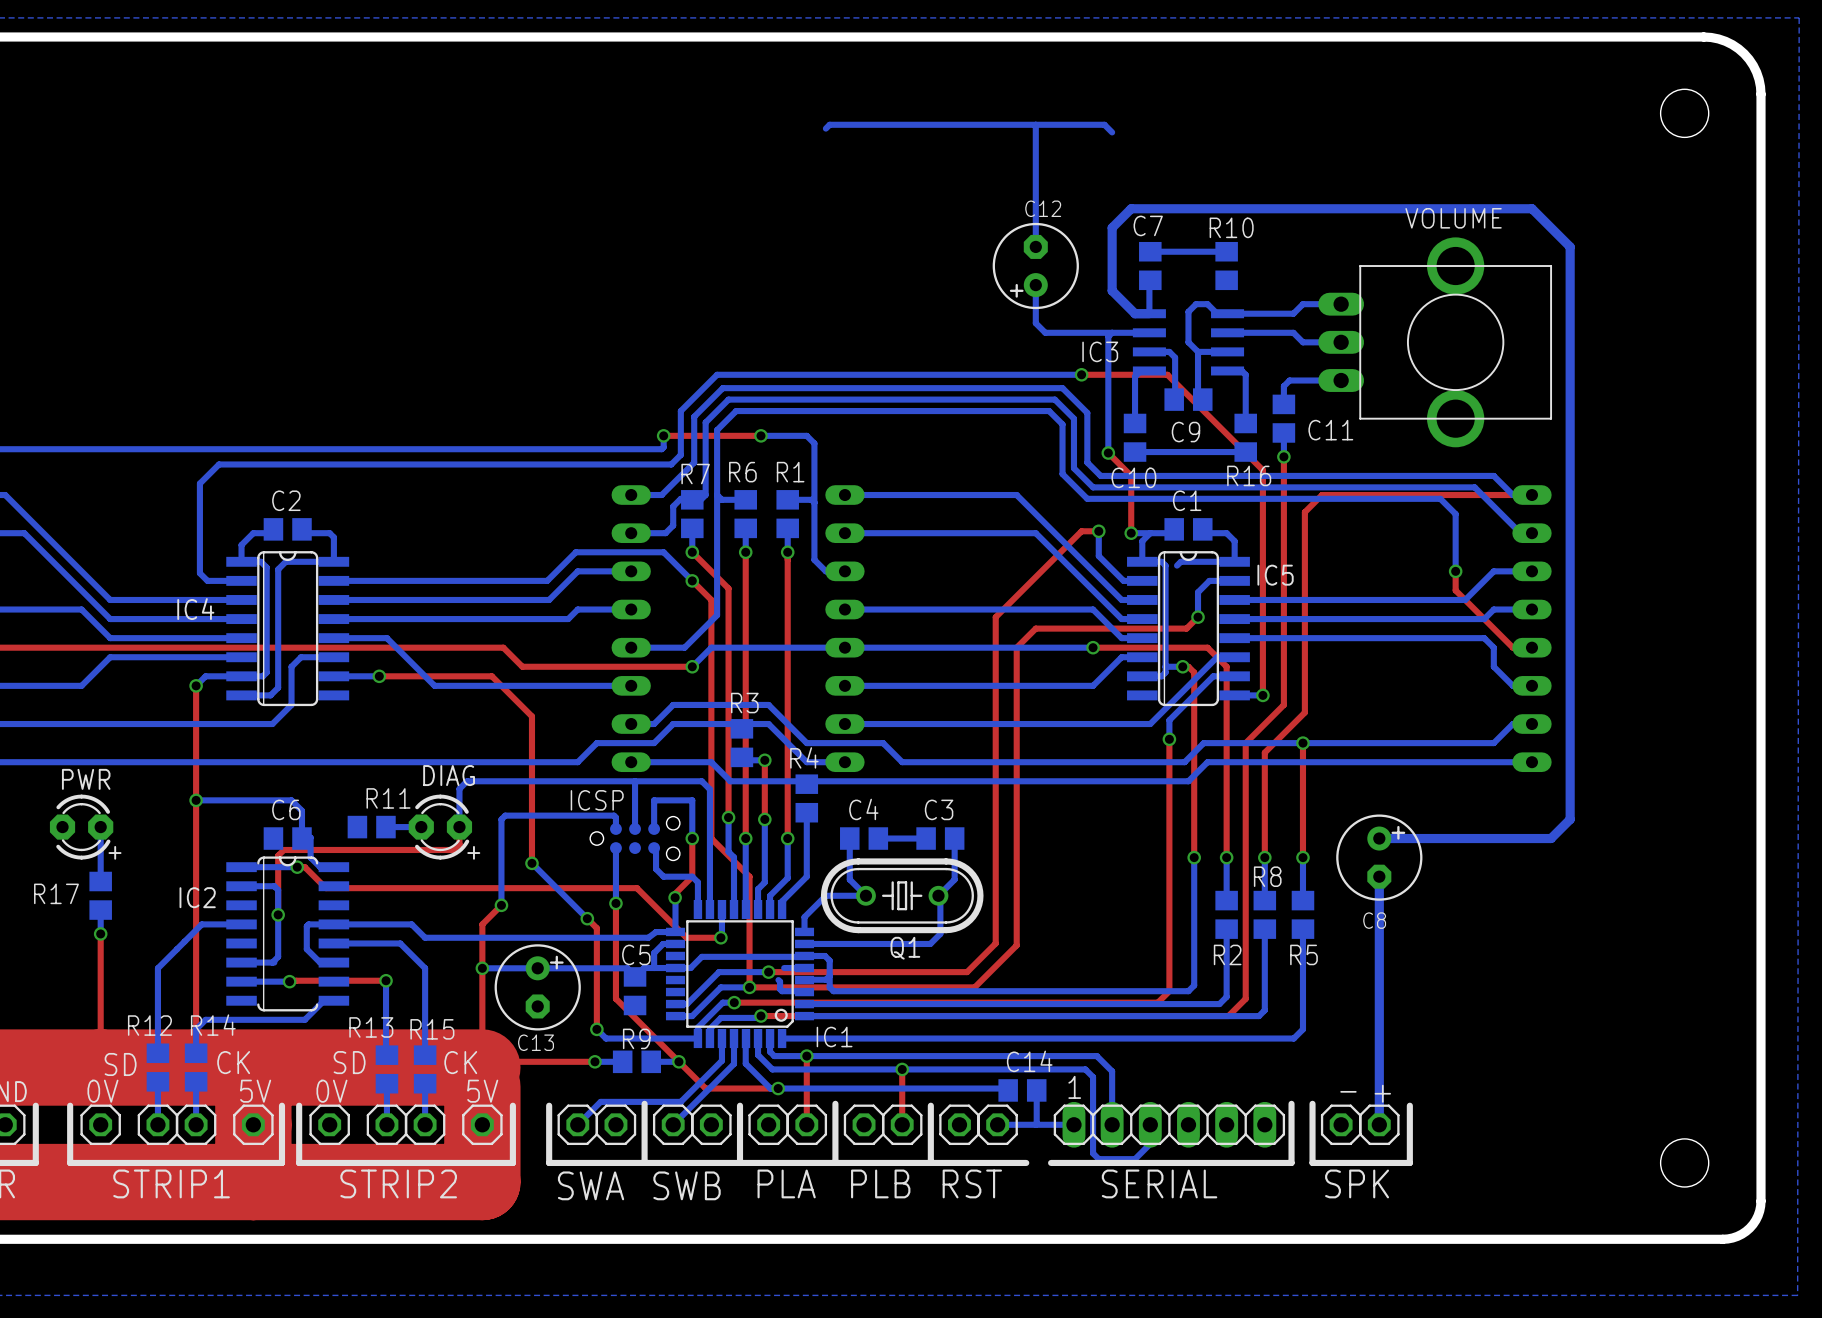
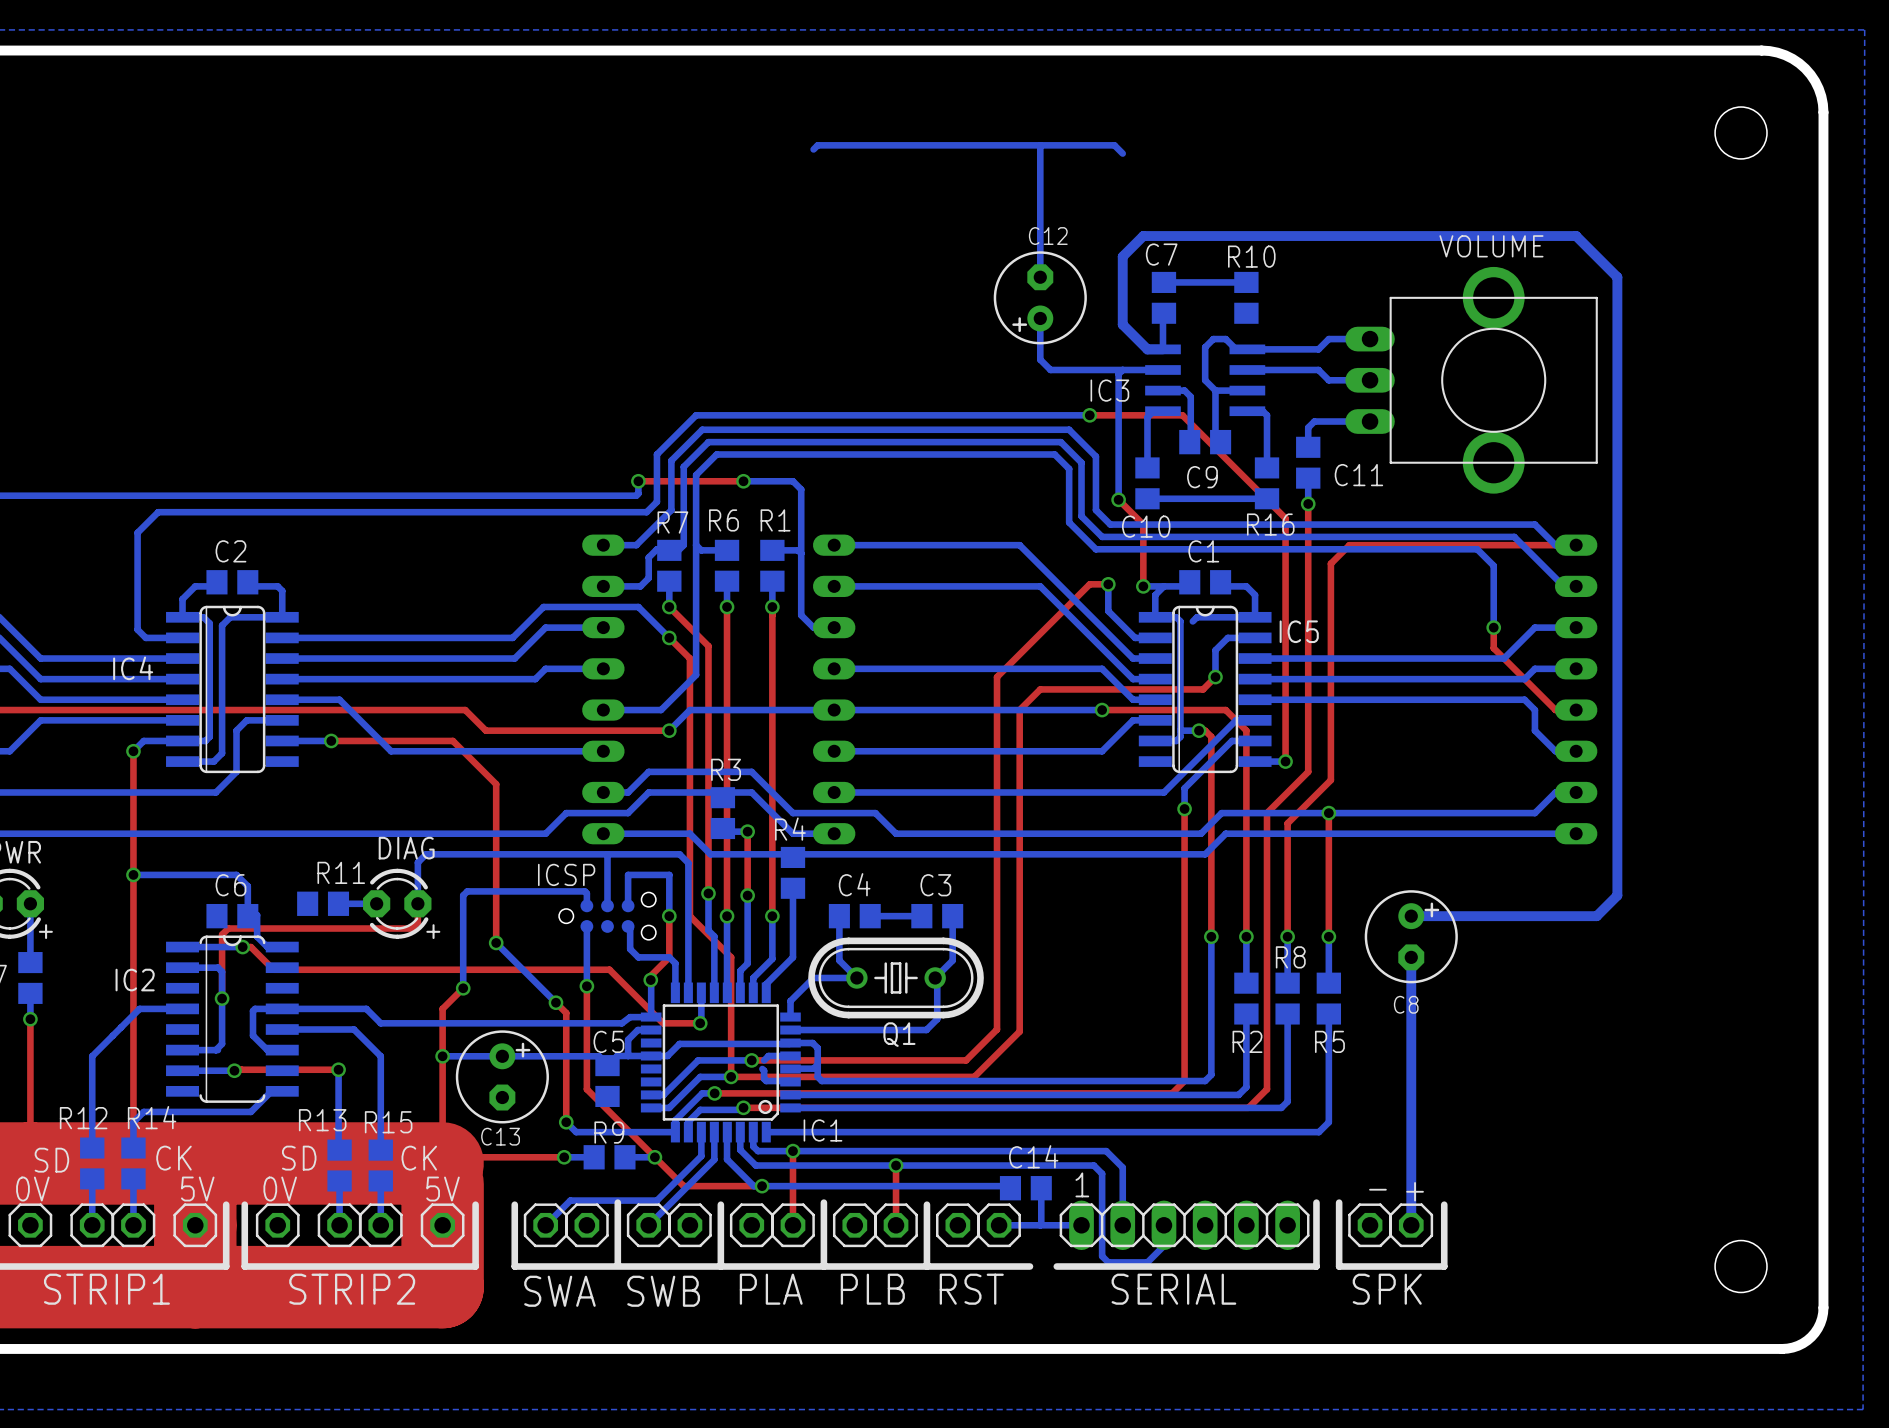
bottom track: none -> (768, 1055) (764, 1060)

